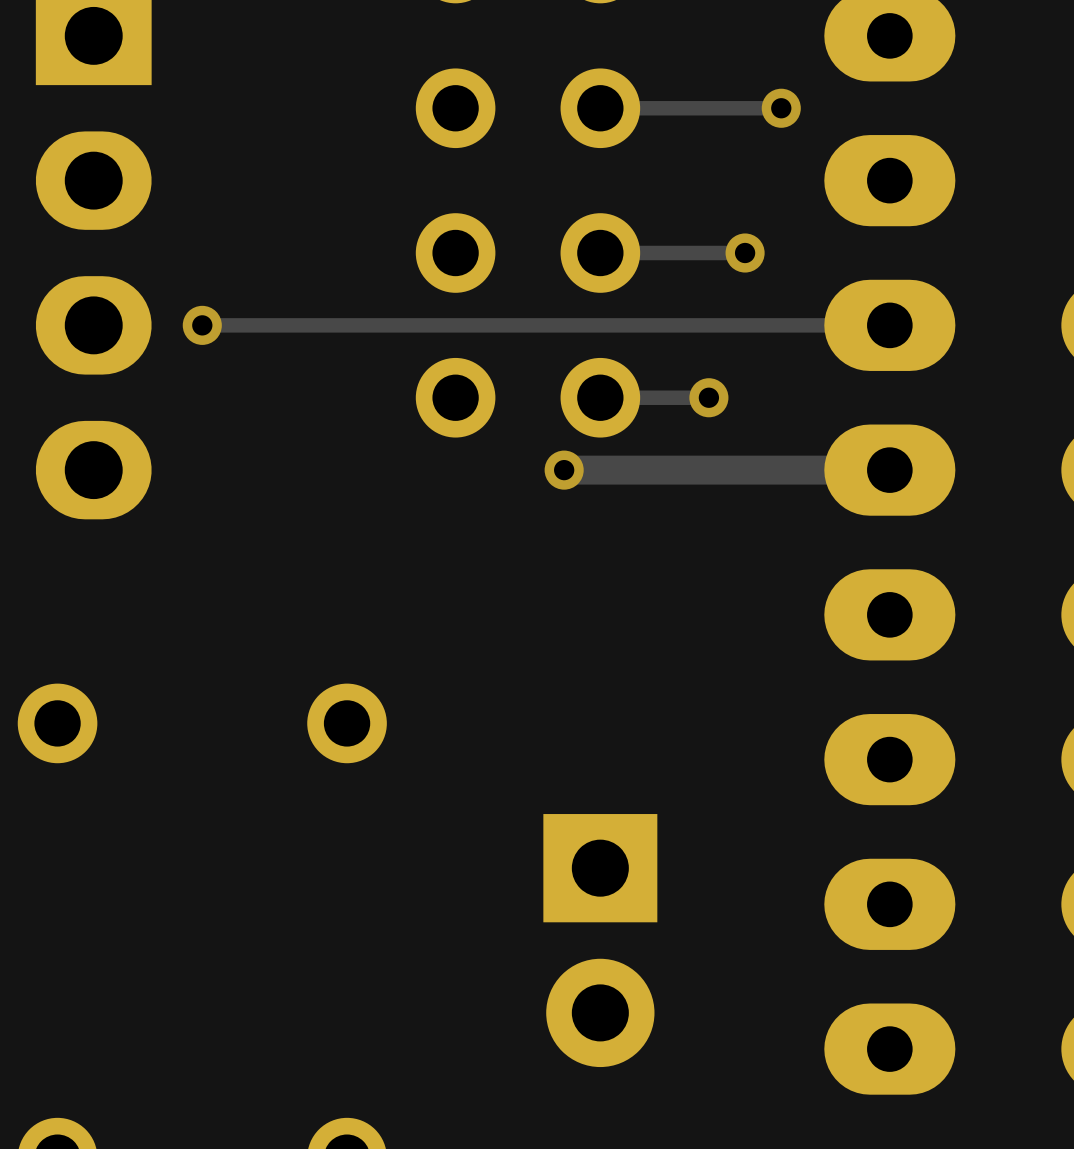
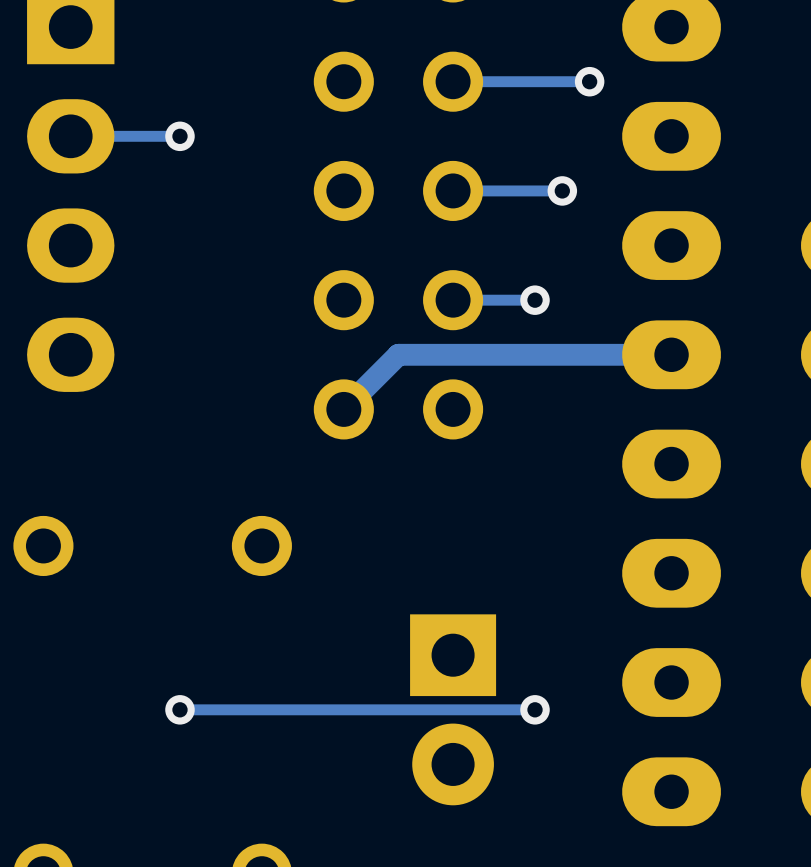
track: none -> (179, 136) (70, 136)
via position: (202, 325) -> (179, 136)
track: (889, 325) (202, 325) -> none
track: none -> (425, 354) (398, 354) (343, 409)
via: (564, 470) -> none
part: none -> (398, 409)
via: none -> (179, 709)
track: none -> (535, 709) (179, 709)
via: none -> (535, 709)

